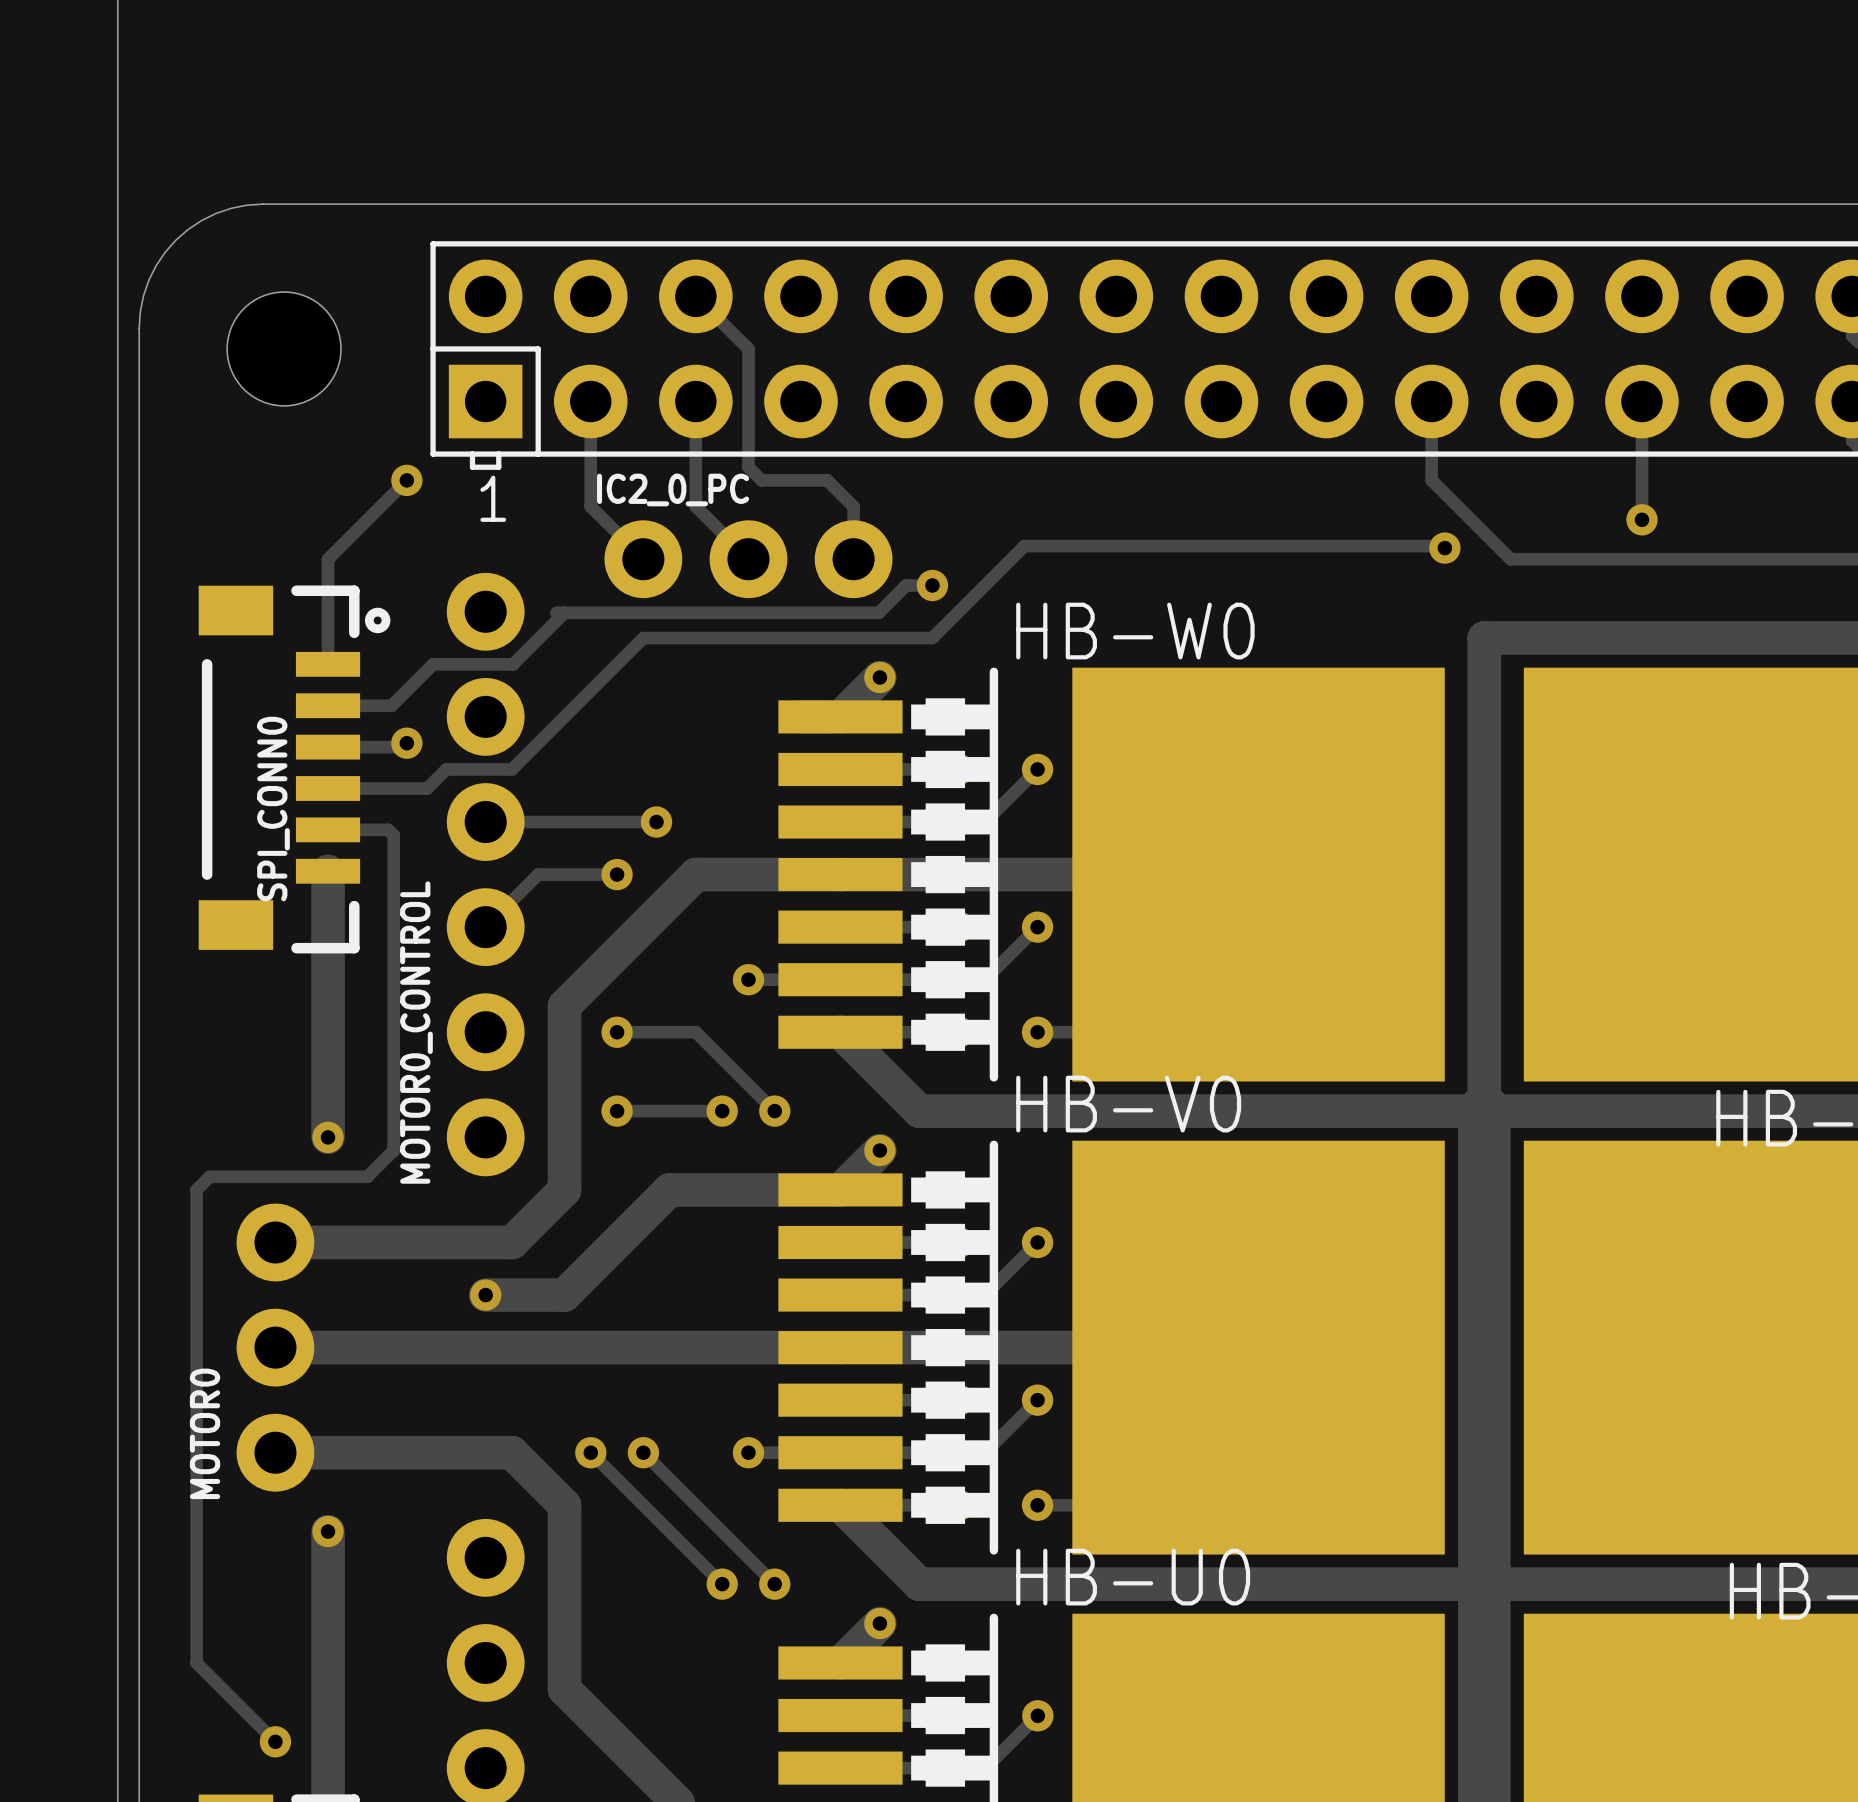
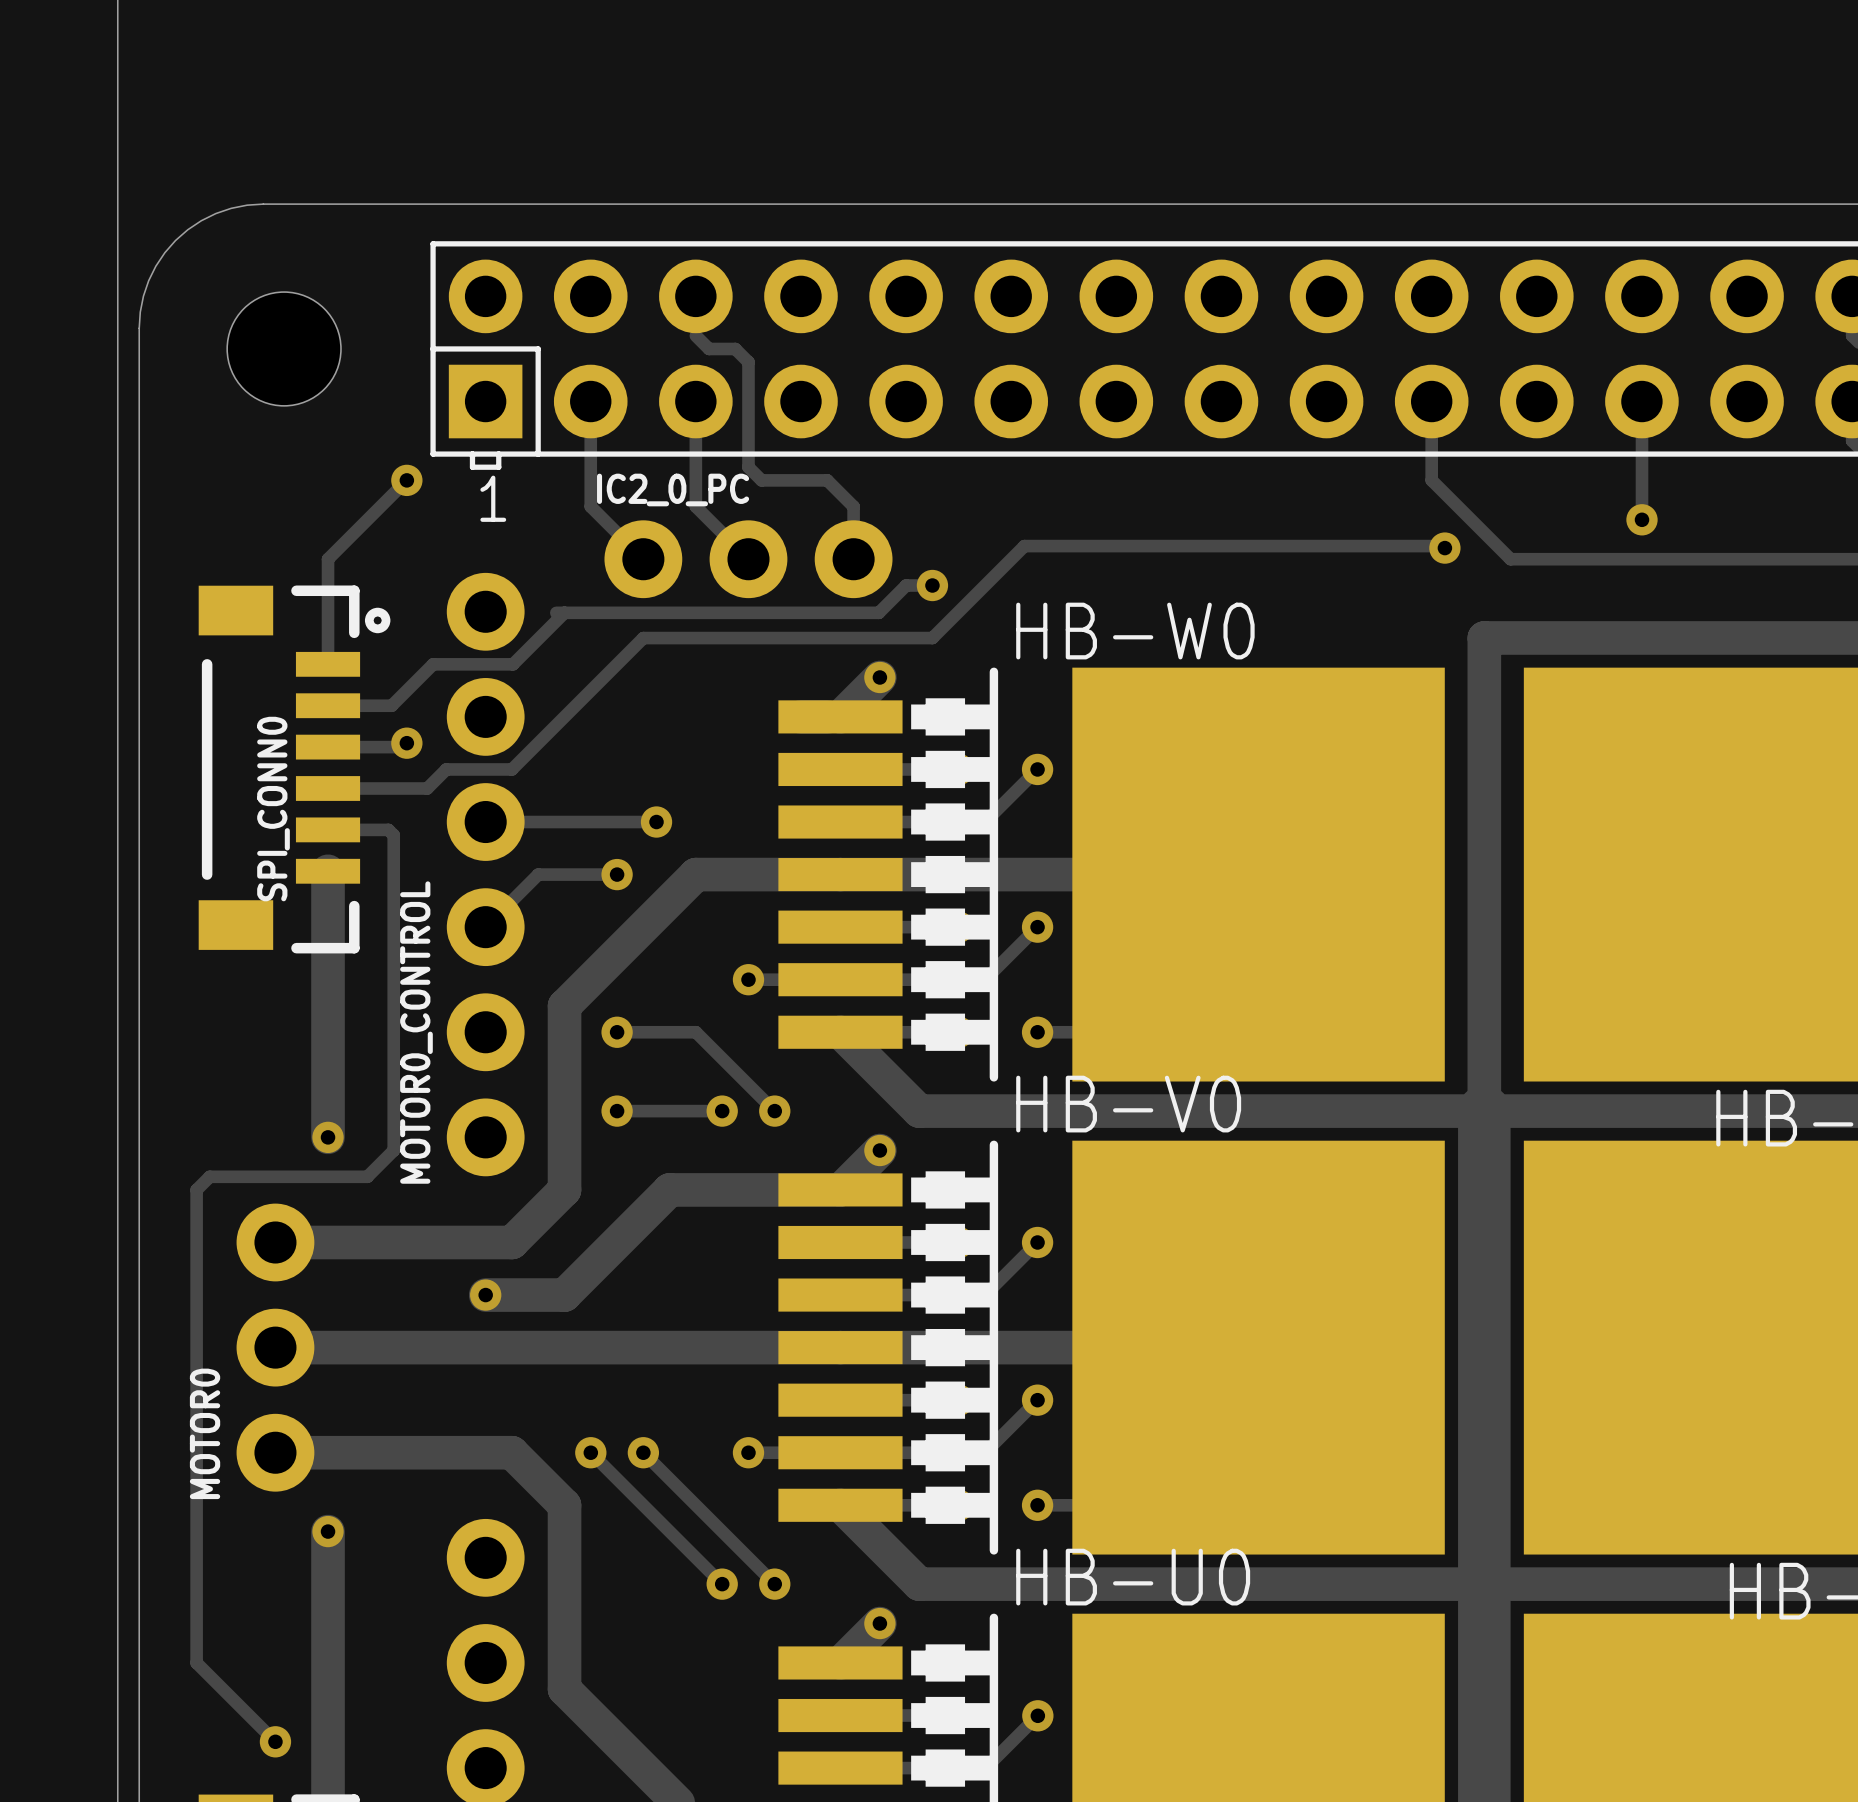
track: (704, 304) (695, 296) (748, 348) (748, 362) -> (695, 335) (709, 348) (735, 348) (748, 362)

